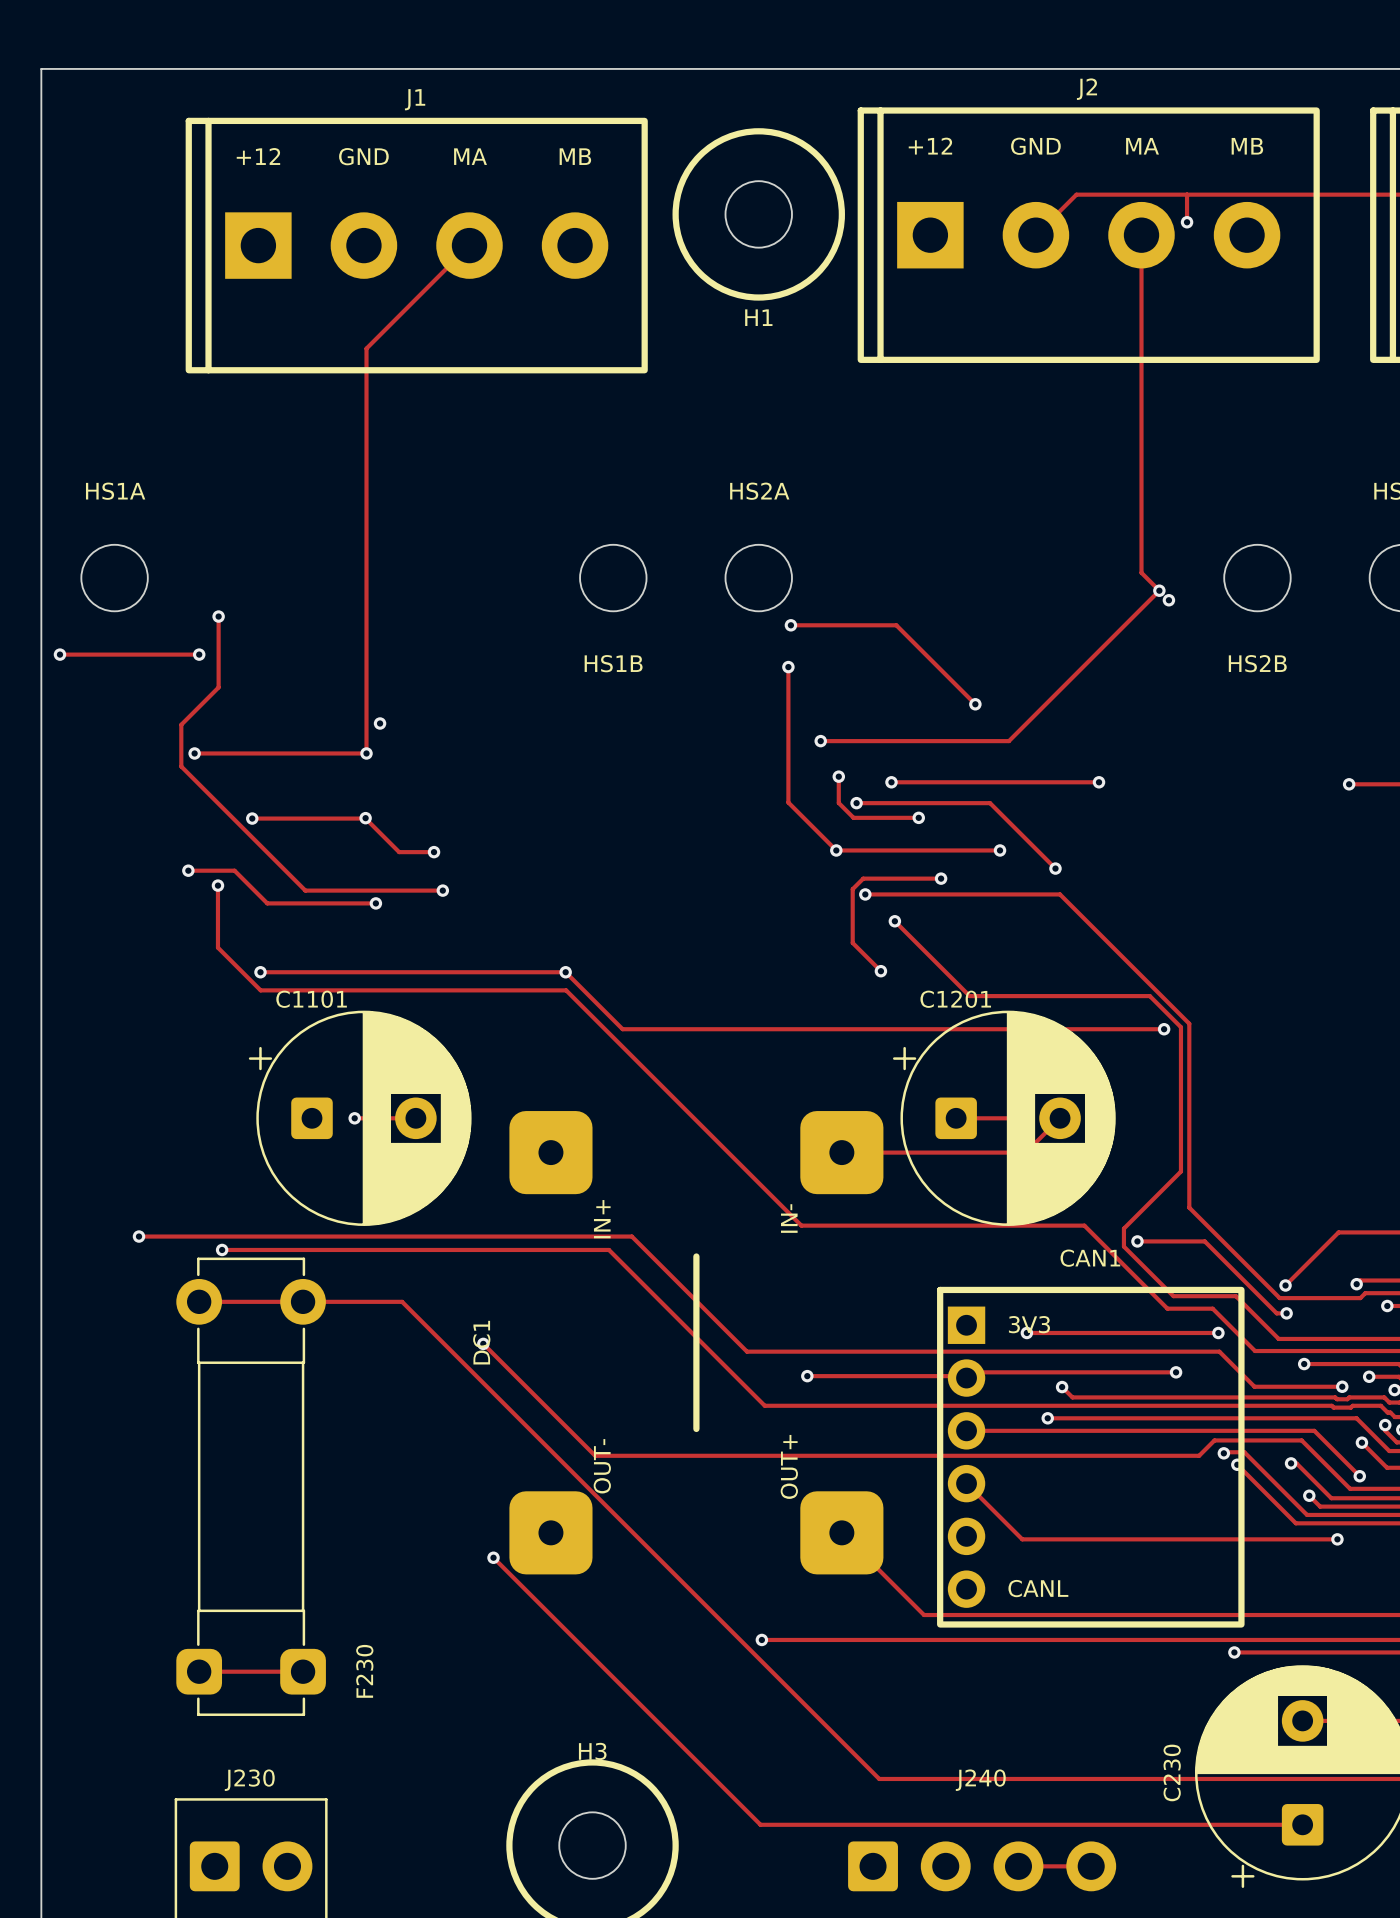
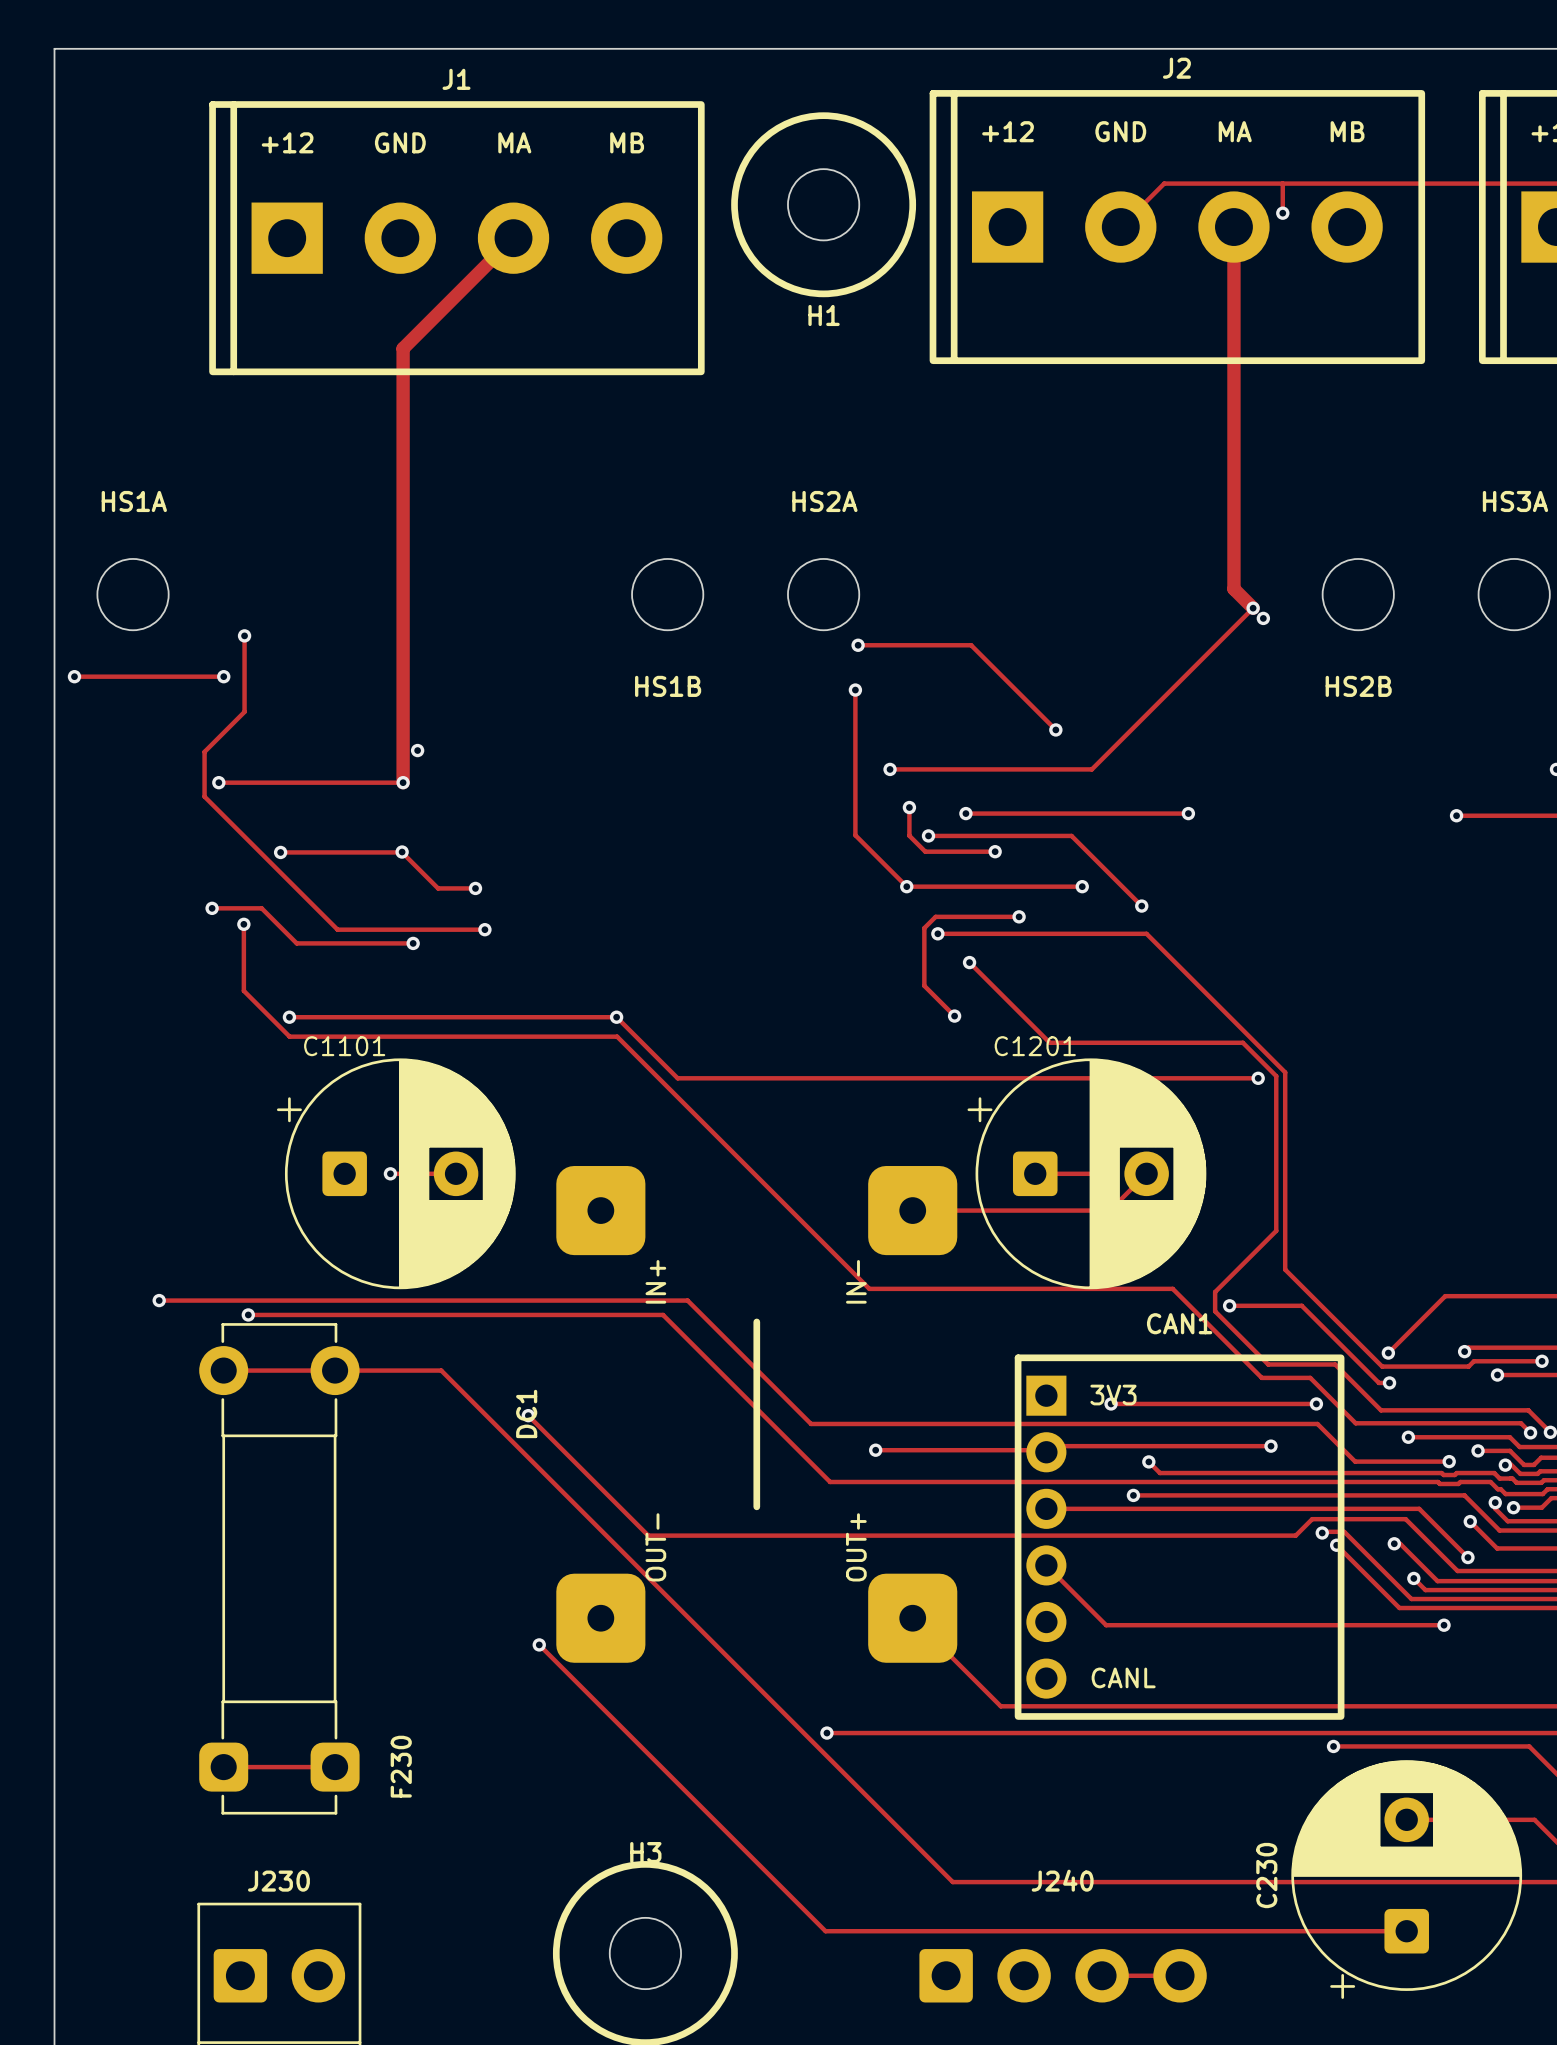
track width: thin (1141, 235) (1141, 572) (1159, 590) -> thick (1233, 227) (1233, 589) (1253, 608)
track width: thin (469, 245) (366, 348) (366, 753) -> thick (513, 238) (403, 348) (403, 782)

